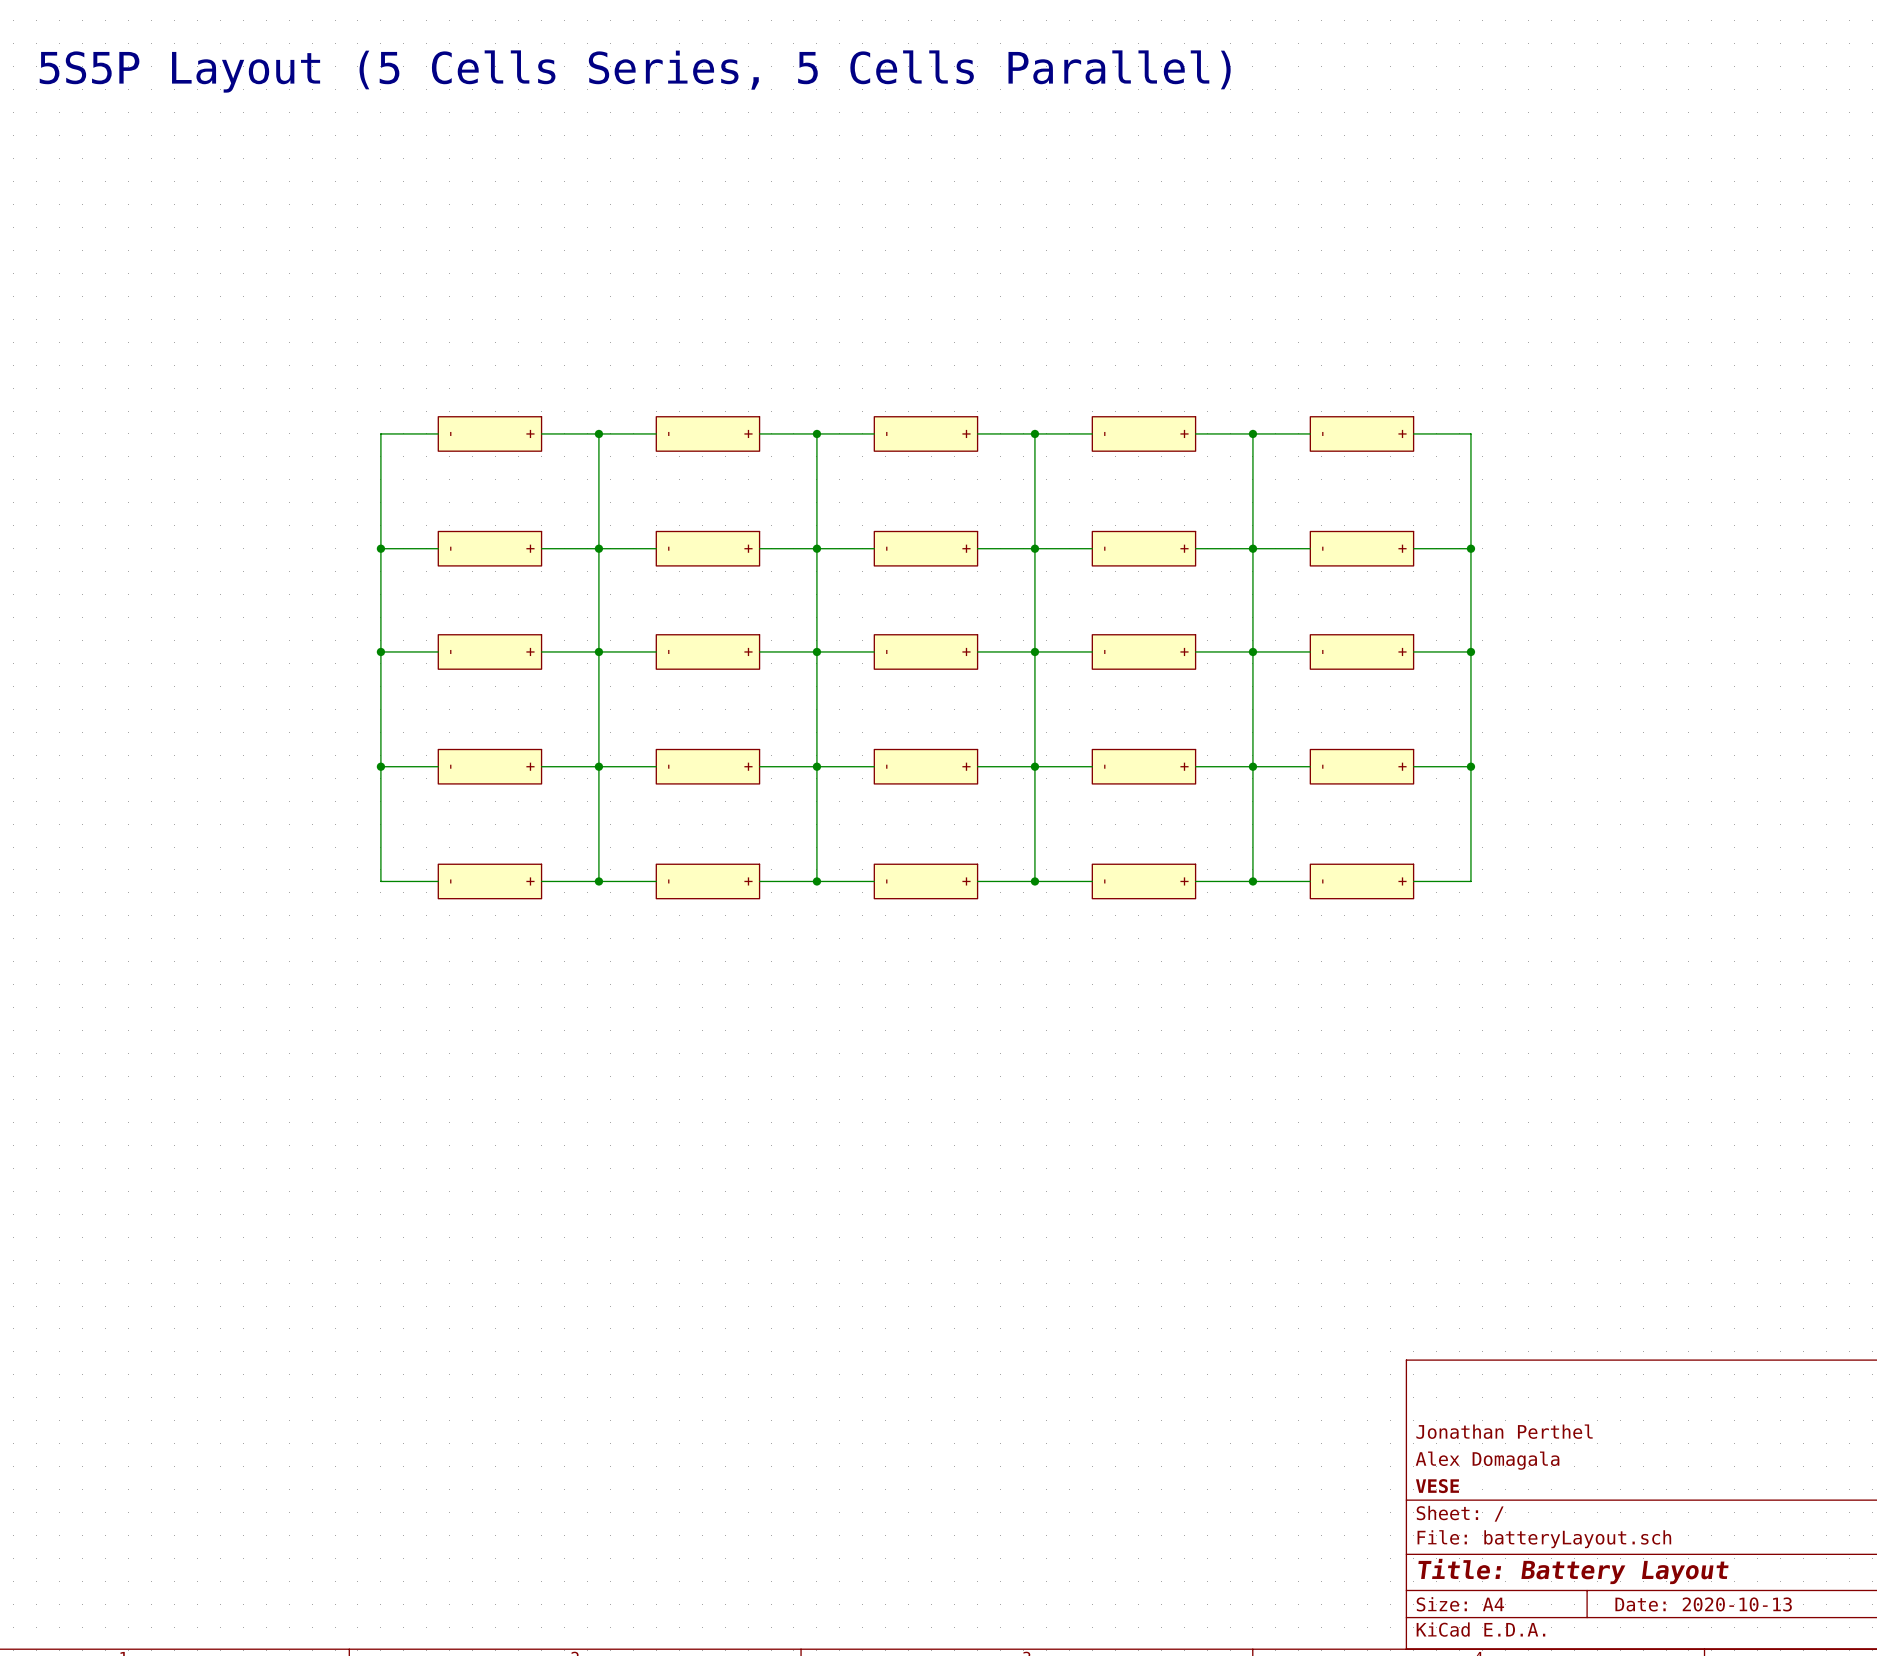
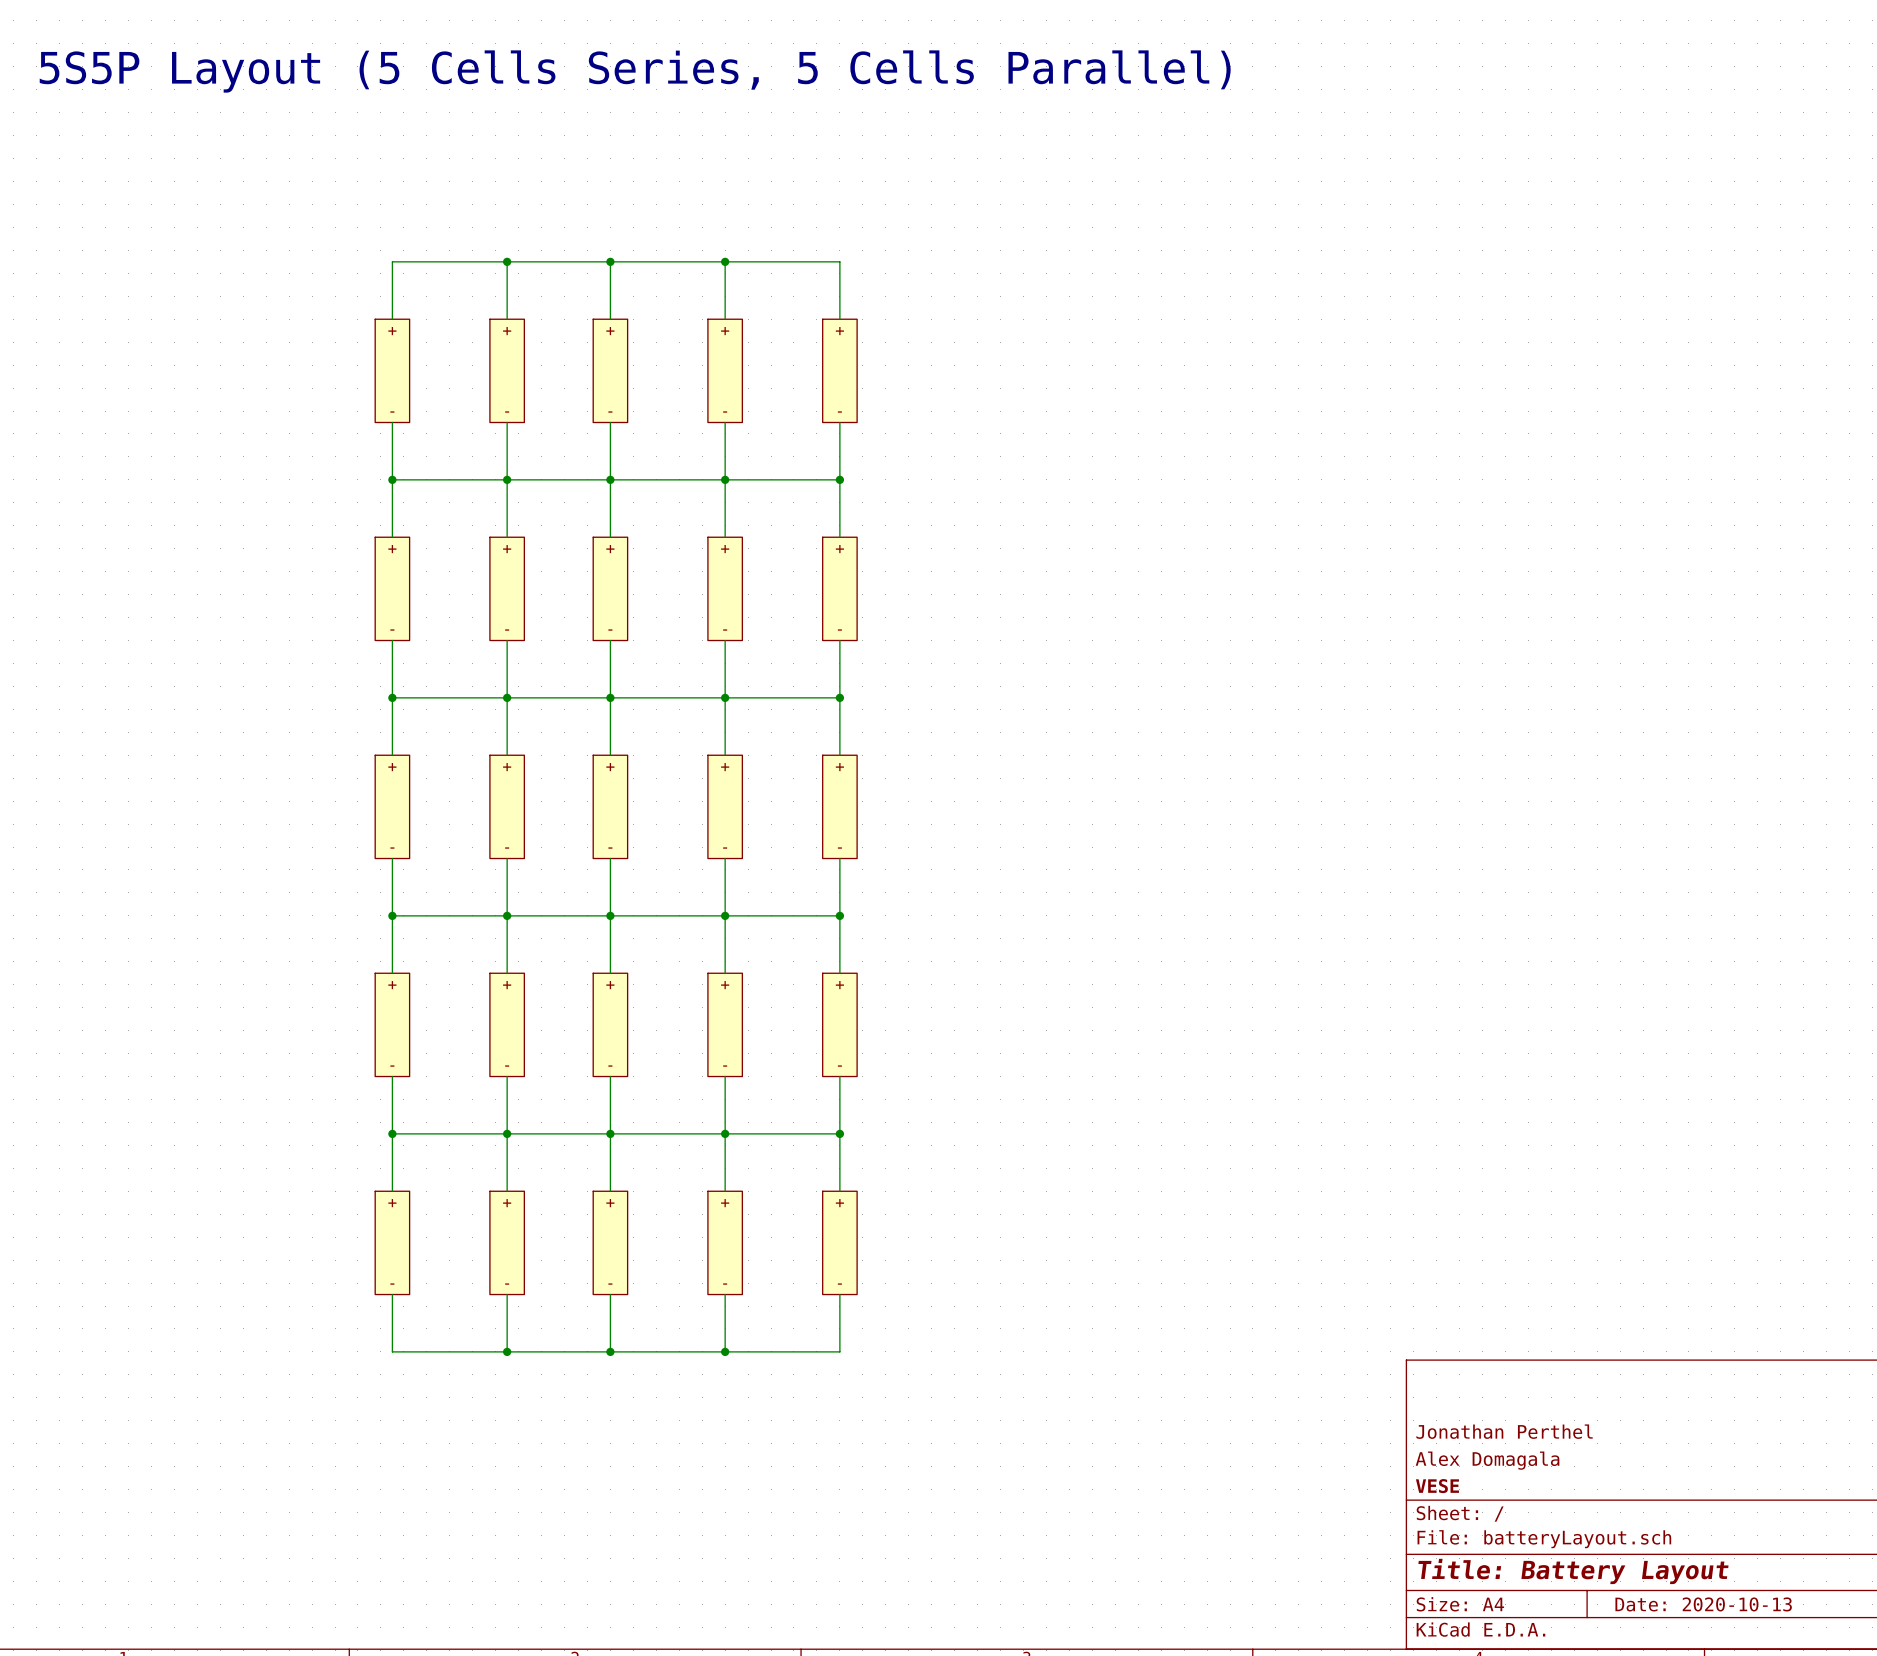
wire: none -> (507, 261) (507, 319)
junction: none -> (507, 261)
wire: none -> (610, 261) (610, 319)
junction: none -> (610, 261)
wire: none -> (725, 261) (725, 319)
junction: none -> (725, 261)
wire: none -> (392, 319) (392, 261) (839, 261) (839, 319)
part: none -> (392, 370)
part: none -> (507, 370)
part: none -> (610, 370)
part: none -> (725, 370)
part: none -> (839, 370)
wire: none -> (392, 422) (392, 537)
wire: none -> (507, 422) (507, 537)
wire: none -> (610, 422) (610, 537)
wire: none -> (725, 422) (725, 537)
wire: none -> (839, 422) (839, 537)
wire: (438, 433) (380, 433) (380, 881) (438, 881) -> none
part: (489, 433) -> none
wire: (541, 433) (656, 433) -> none
wire: (598, 433) (598, 881) -> none
junction: (598, 433) -> none
part: (707, 433) -> none
wire: (759, 433) (874, 433) -> none
wire: (816, 433) (816, 881) -> none
junction: (816, 433) -> none
part: (925, 433) -> none
wire: (977, 433) (1092, 433) -> none
wire: (1034, 433) (1034, 881) -> none
junction: (1034, 433) -> none
part: (1143, 433) -> none
wire: (1195, 433) (1310, 433) -> none
wire: (1252, 433) (1252, 881) -> none
junction: (1252, 433) -> none
part: (1361, 433) -> none
wire: (1413, 433) (1470, 433) (1470, 881) (1413, 881) -> none
wire: none -> (392, 479) (839, 479)
junction: none -> (392, 479)
junction: none -> (507, 479)
junction: none -> (610, 479)
junction: none -> (725, 479)
junction: none -> (839, 479)
wire: (380, 548) (438, 548) -> none
junction: (380, 548) -> none
part: (489, 548) -> none
wire: (541, 548) (656, 548) -> none
junction: (598, 548) -> none
part: (707, 548) -> none
wire: (759, 548) (874, 548) -> none
junction: (816, 548) -> none
part: (925, 548) -> none
wire: (977, 548) (1092, 548) -> none
junction: (1034, 548) -> none
part: (1143, 548) -> none
wire: (1195, 548) (1310, 548) -> none
junction: (1252, 548) -> none
part: (1361, 548) -> none
wire: (1413, 548) (1470, 548) -> none
junction: (1470, 548) -> none
part: none -> (392, 588)
part: none -> (507, 588)
part: none -> (610, 588)
part: none -> (725, 588)
part: none -> (839, 588)
wire: none -> (392, 640) (392, 755)
wire: none -> (507, 640) (507, 755)
wire: none -> (610, 640) (610, 755)
wire: none -> (725, 640) (725, 755)
wire: none -> (839, 640) (839, 755)
wire: (380, 651) (438, 651) -> none
junction: (380, 651) -> none
part: (489, 651) -> none
wire: (541, 651) (656, 651) -> none
junction: (598, 651) -> none
part: (707, 651) -> none
wire: (759, 651) (874, 651) -> none
junction: (816, 651) -> none
part: (925, 651) -> none
wire: (977, 651) (1092, 651) -> none
junction: (1034, 651) -> none
part: (1143, 651) -> none
wire: (1195, 651) (1310, 651) -> none
junction: (1252, 651) -> none
part: (1361, 651) -> none
wire: (1413, 651) (1470, 651) -> none
junction: (1470, 651) -> none
wire: none -> (392, 697) (839, 697)
junction: none -> (392, 697)
junction: none -> (507, 697)
junction: none -> (610, 697)
junction: none -> (725, 697)
junction: none -> (839, 697)
wire: (380, 766) (438, 766) -> none
junction: (380, 766) -> none
part: (489, 766) -> none
wire: (541, 766) (656, 766) -> none
junction: (598, 766) -> none
part: (707, 766) -> none
wire: (759, 766) (874, 766) -> none
junction: (816, 766) -> none
part: (925, 766) -> none
wire: (977, 766) (1092, 766) -> none
junction: (1034, 766) -> none
part: (1143, 766) -> none
wire: (1195, 766) (1310, 766) -> none
junction: (1252, 766) -> none
part: (1361, 766) -> none
wire: (1413, 766) (1470, 766) -> none
junction: (1470, 766) -> none
part: none -> (392, 806)
part: none -> (507, 806)
part: none -> (610, 806)
part: none -> (725, 806)
part: none -> (839, 806)
wire: none -> (392, 858) (392, 973)
wire: none -> (507, 858) (507, 973)
wire: none -> (610, 858) (610, 973)
wire: none -> (725, 858) (725, 973)
wire: none -> (839, 858) (839, 973)
part: (489, 881) -> none
wire: (541, 881) (656, 881) -> none
junction position: (598, 881) -> (610, 915)
part: (707, 881) -> none
wire: (759, 881) (874, 881) -> none
junction position: (816, 881) -> (839, 915)
part: (925, 881) -> none
wire: (977, 881) (1092, 881) -> none
junction: (1034, 881) -> none
part: (1143, 881) -> none
wire: (1195, 881) (1310, 881) -> none
junction: (1252, 881) -> none
part: (1361, 881) -> none
wire: none -> (392, 915) (839, 915)
junction: none -> (392, 915)
junction: none -> (507, 915)
junction: none -> (725, 915)
part: none -> (392, 1024)
part: none -> (507, 1024)
part: none -> (610, 1024)
part: none -> (725, 1024)
part: none -> (839, 1024)
wire: none -> (392, 1076) (392, 1191)
wire: none -> (507, 1076) (507, 1191)
wire: none -> (610, 1076) (610, 1191)
wire: none -> (725, 1076) (725, 1191)
wire: none -> (839, 1076) (839, 1191)
wire: none -> (392, 1133) (839, 1133)
junction: none -> (392, 1133)
junction: none -> (507, 1133)
junction: none -> (610, 1133)
junction: none -> (725, 1133)
junction: none -> (839, 1133)
part: none -> (392, 1242)
part: none -> (507, 1242)
part: none -> (610, 1242)
part: none -> (725, 1242)
part: none -> (839, 1242)
wire: none -> (392, 1294) (392, 1351) (839, 1351) (839, 1294)
wire: none -> (507, 1294) (507, 1351)
wire: none -> (610, 1294) (610, 1351)
wire: none -> (725, 1294) (725, 1351)
junction: none -> (507, 1351)
junction: none -> (610, 1351)
junction: none -> (725, 1351)

